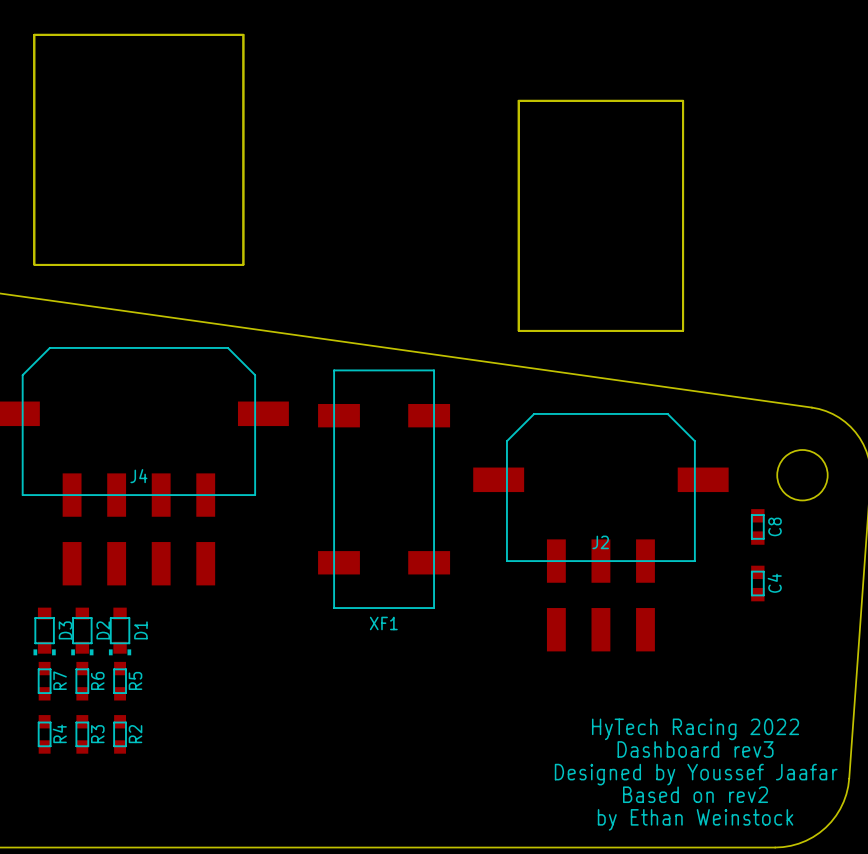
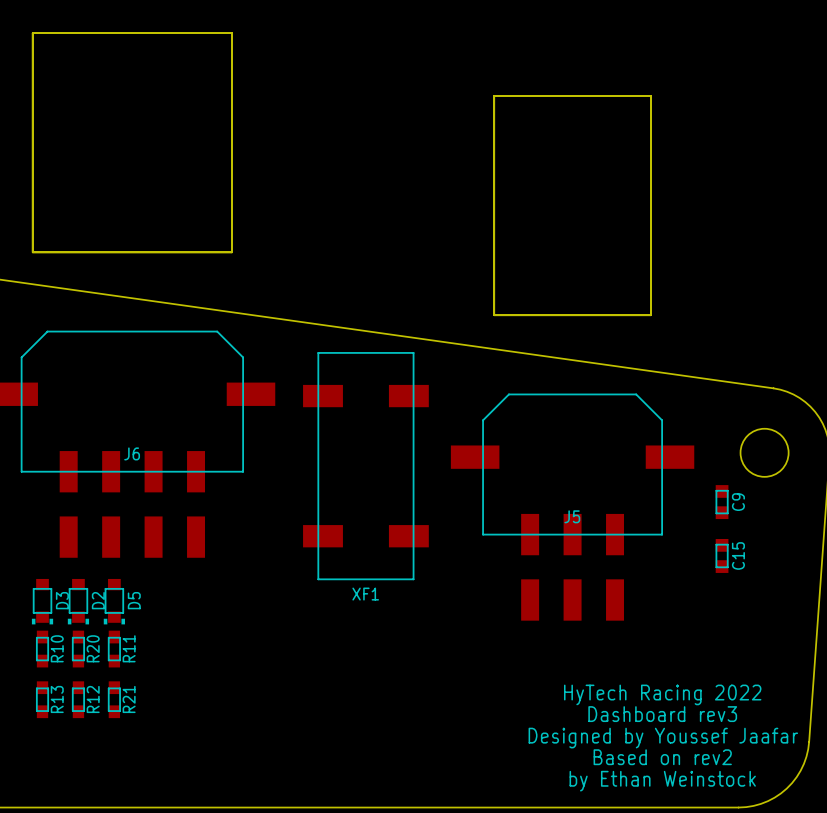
J4 name: J4 (138, 476) -> J6 (132, 453)
C8 name: C8 (775, 526) -> C9 (738, 502)
J2 name: J2 (600, 542) -> J5 (572, 516)
C4 name: C4 (774, 583) -> C15 (738, 555)
D1 name: D1 (140, 630) -> D5 (134, 600)
R7 name: R7 (60, 680) -> R10 (57, 648)
R6 name: R6 (97, 680) -> R20 (93, 648)
R5 name: R5 (135, 680) -> R11 (129, 648)
R4 name: R4 (59, 733) -> R13 (57, 699)
R3 name: R3 (97, 734) -> R12 (93, 699)
R2 name: R2 (135, 734) -> R21 (129, 699)

